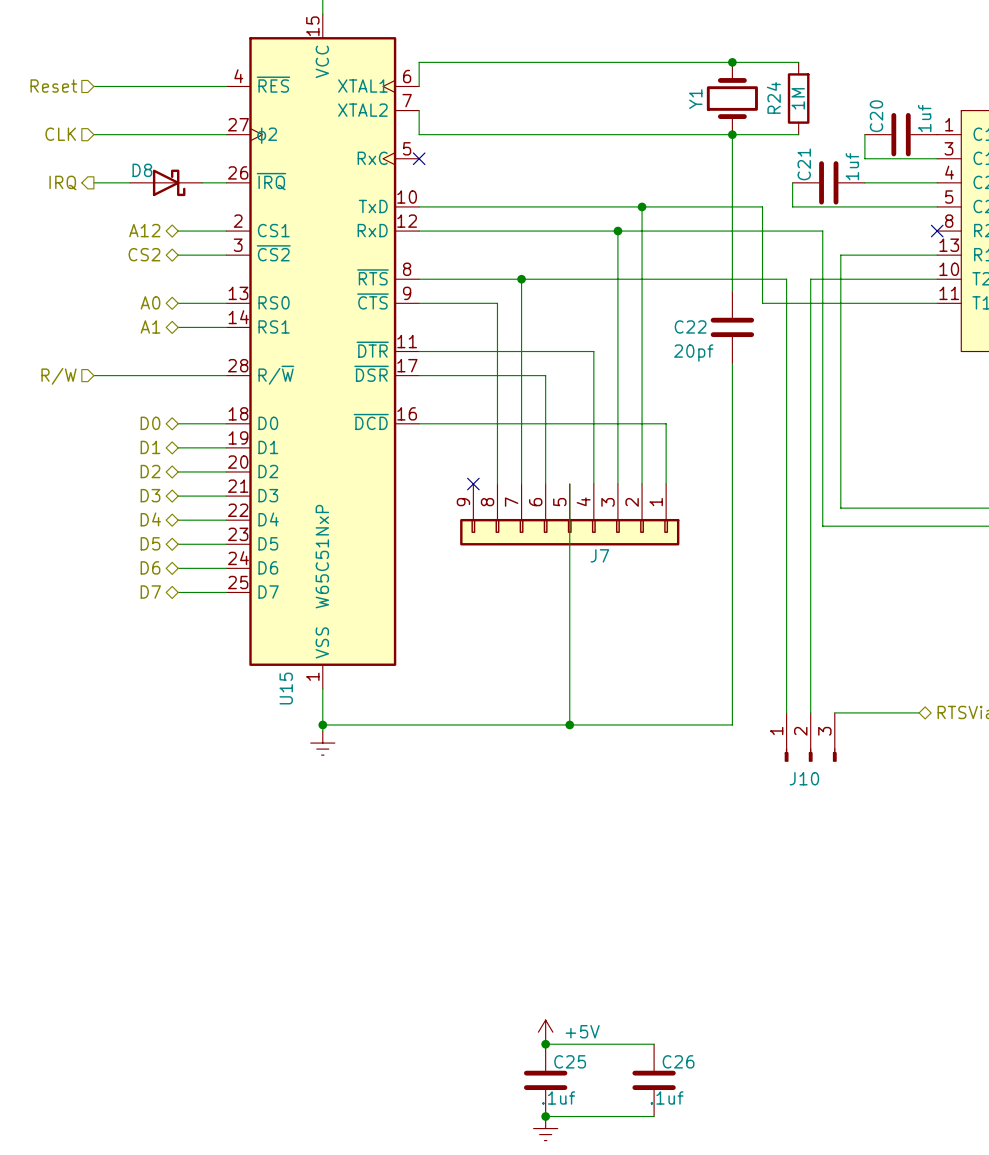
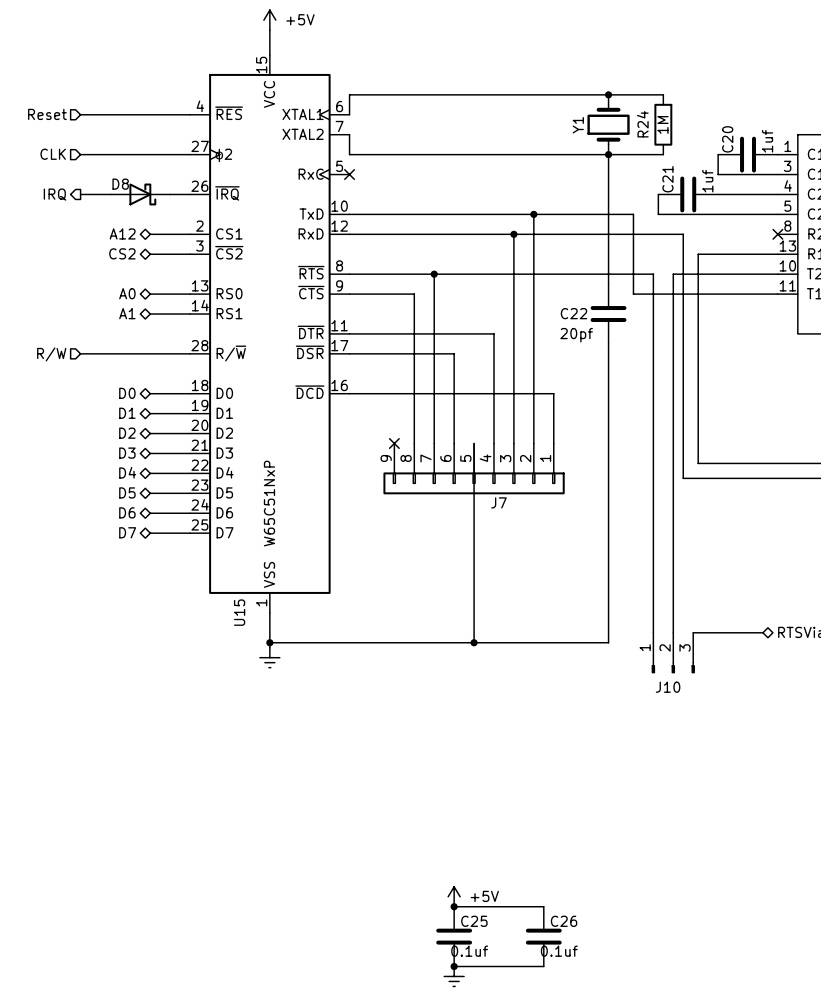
C25 value: .1uf (558, 1097) -> 0.1uf (469, 951)
C26 value: .1uf (667, 1097) -> 0.1uf (559, 951)

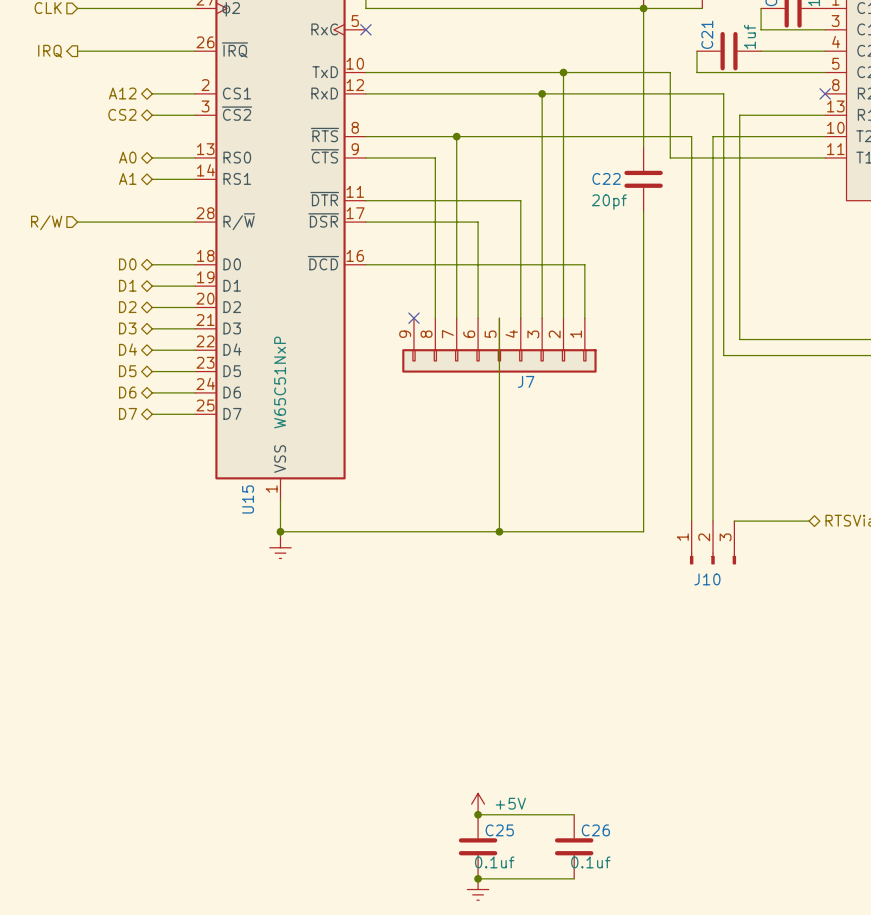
D8: (140, 194) -> none

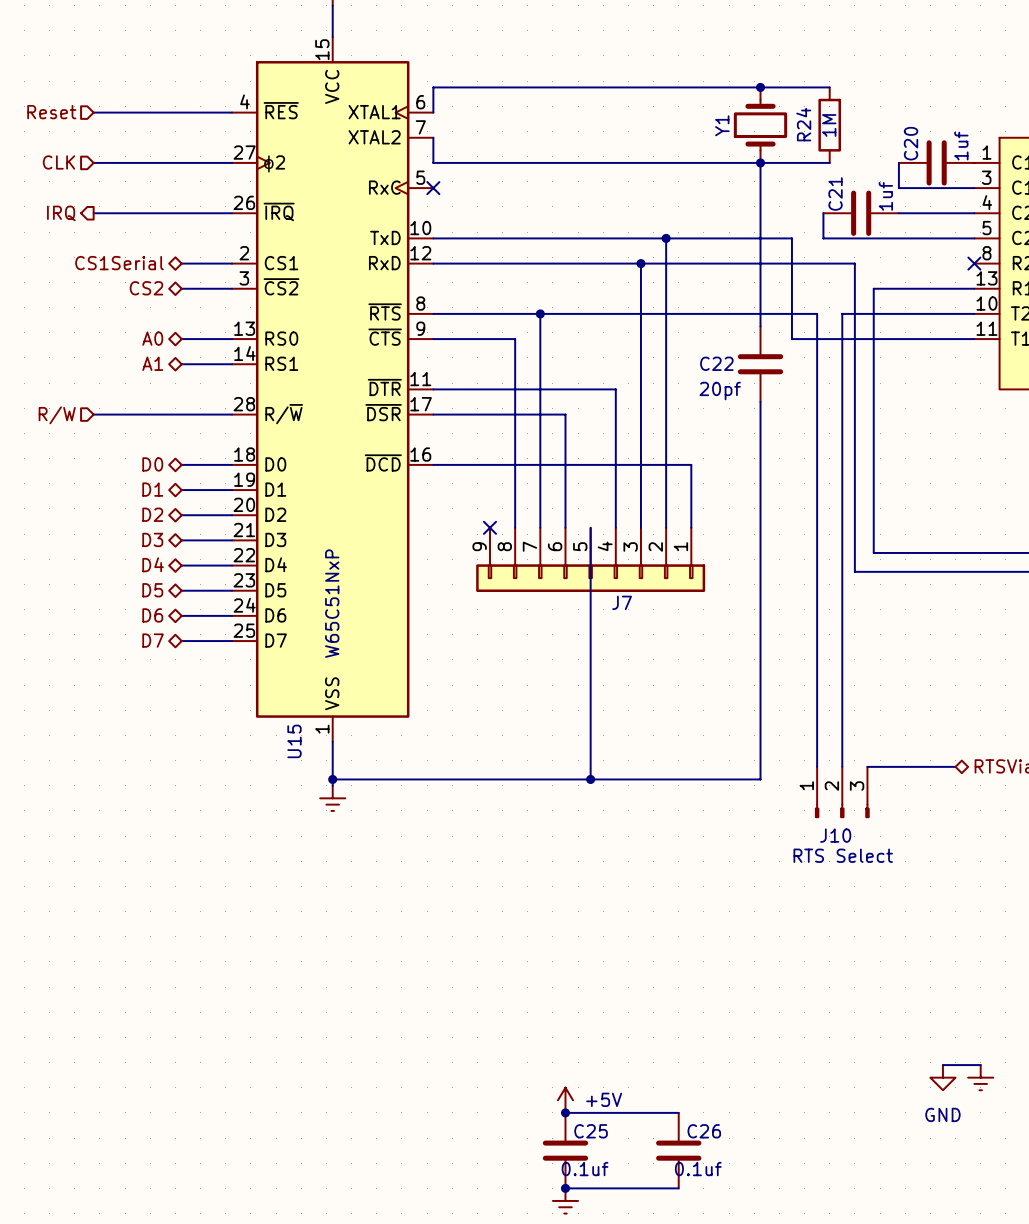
hierarchical label: A12 (122, 93) -> CS1Serial (119, 263)
J10 value: none -> RTS Select (843, 855)
wire: none -> (942, 1065) (980, 1065)
power symbol: none -> GND (942, 1077)
power symbol: none -> (980, 1077)

